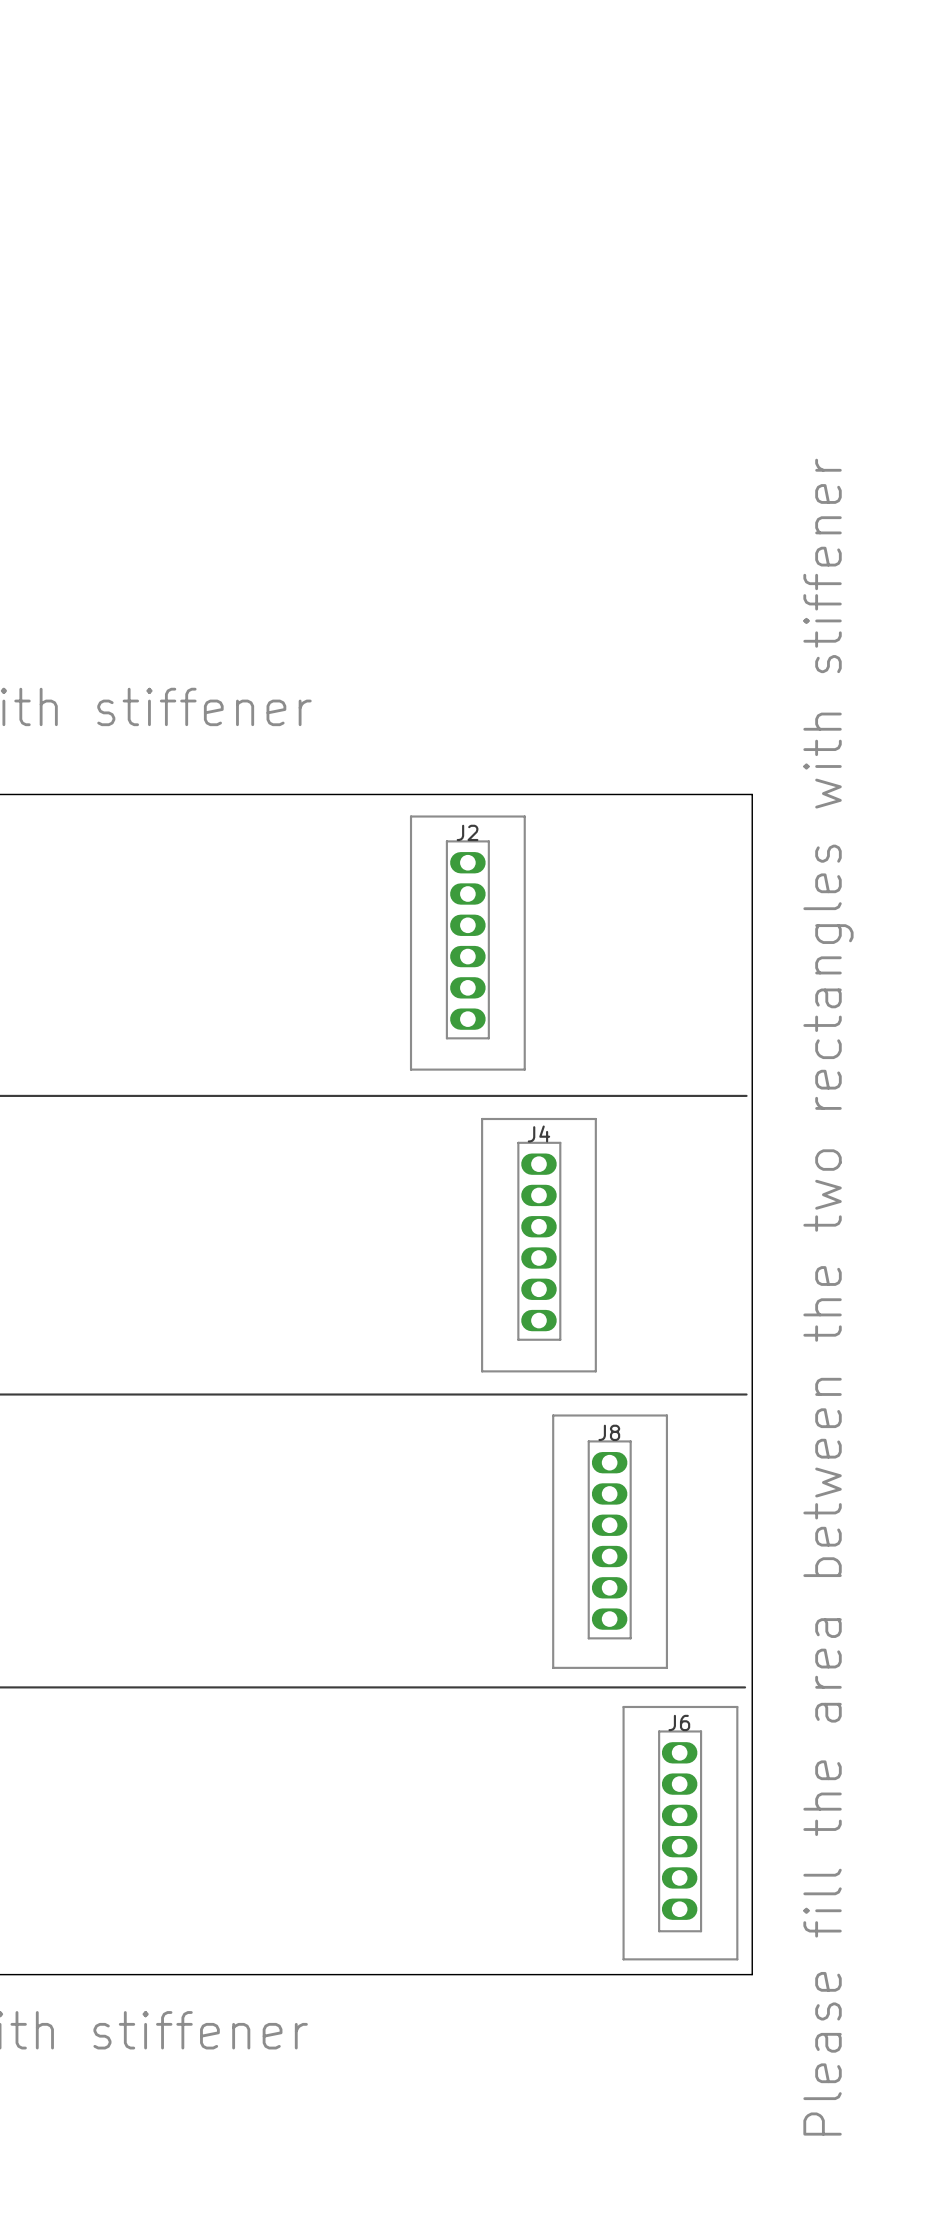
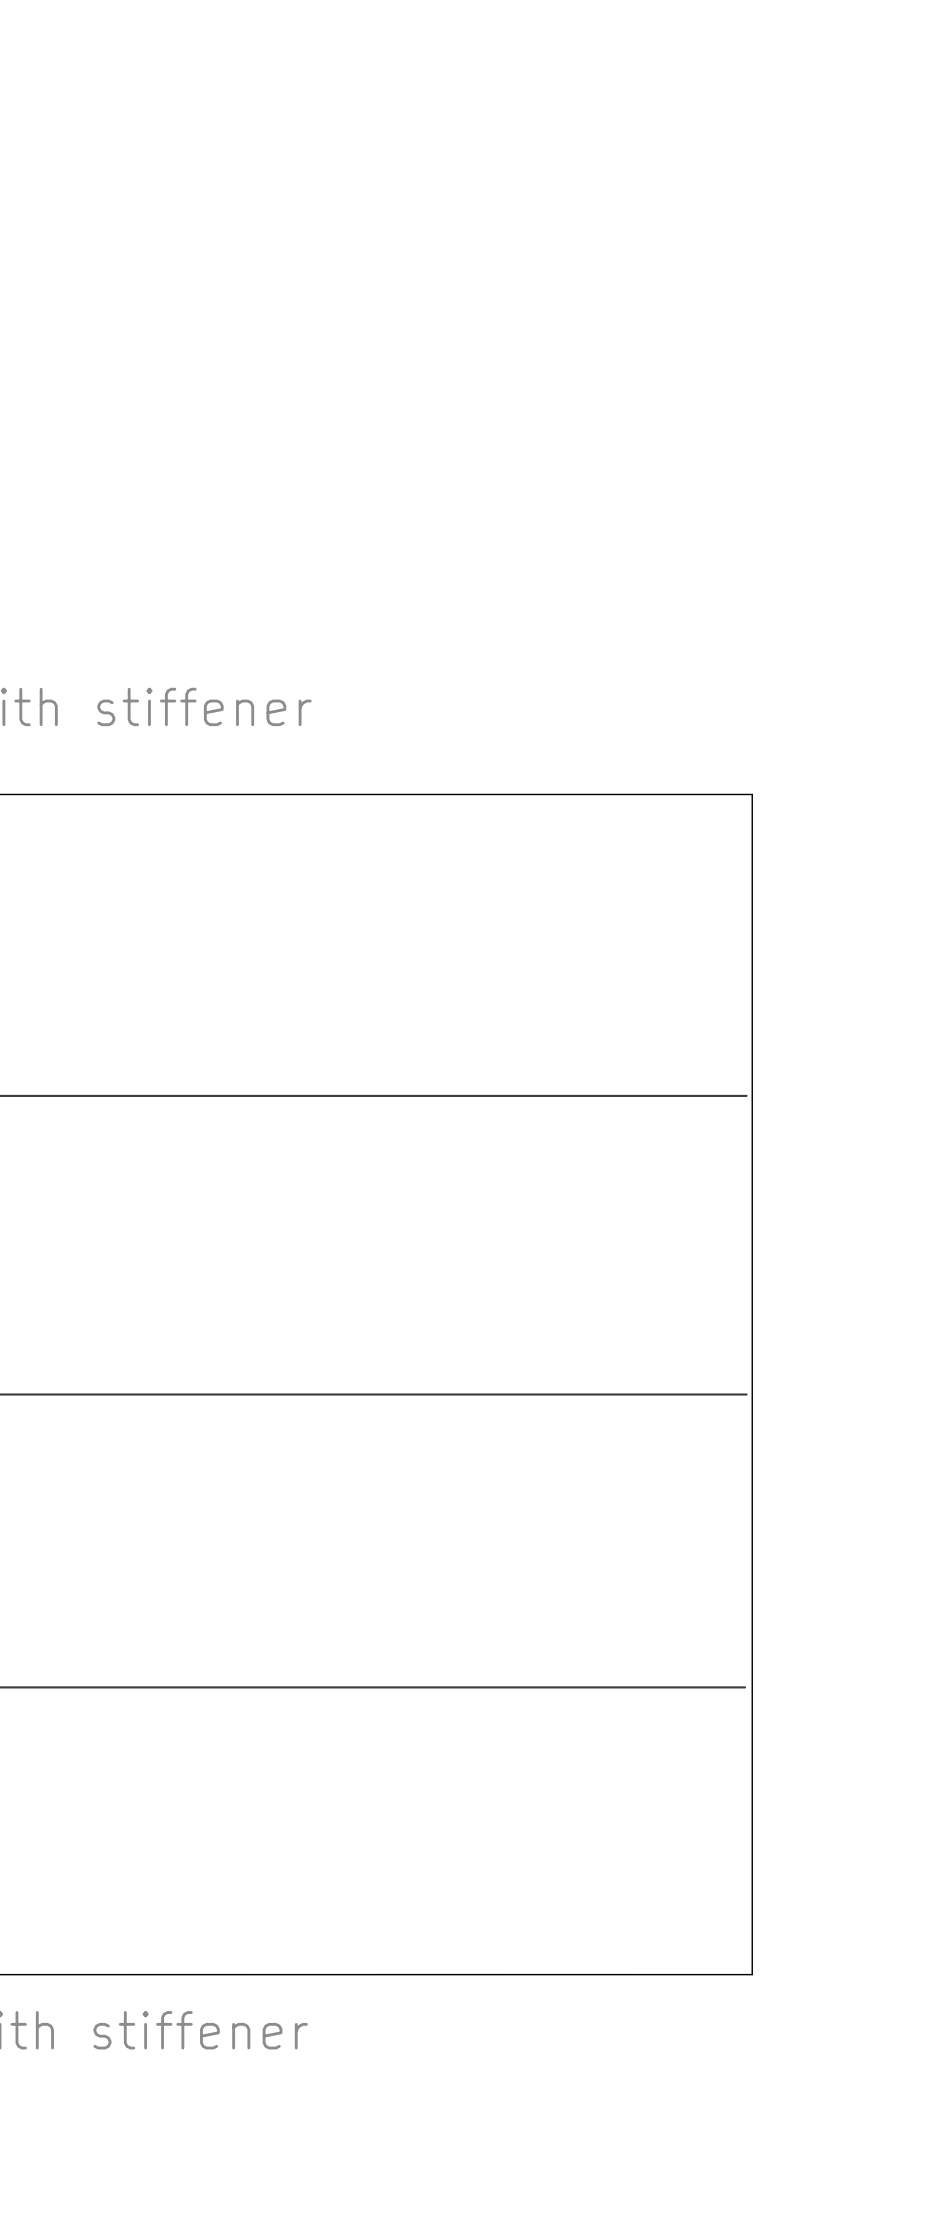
line: (411, 816) (524, 816) (524, 1069) (411, 1069) (411, 816) -> none
line: (446, 841) (488, 841) (488, 1038) (446, 1038) (446, 841) -> none
J2: (467, 940) -> none
line: (482, 1118) (595, 1118) (595, 1371) (482, 1371) (482, 1118) -> none
line: (518, 1142) (560, 1142) (560, 1339) (518, 1339) (518, 1142) -> none
J4: (538, 1242) -> none
text: Please fill the area between the two rectangles with stiffener (828, 1297) -> none
line: (553, 1415) (666, 1415) (666, 1667) (553, 1667) (553, 1415) -> none
line: (588, 1441) (630, 1441) (630, 1638) (588, 1638) (588, 1441) -> none
J8: (609, 1540) -> none
line: (623, 1706) (737, 1706) (737, 1959) (623, 1959) (623, 1706) -> none
line: (659, 1731) (701, 1731) (701, 1931) (659, 1931) (659, 1731) -> none
J6: (679, 1831) -> none

